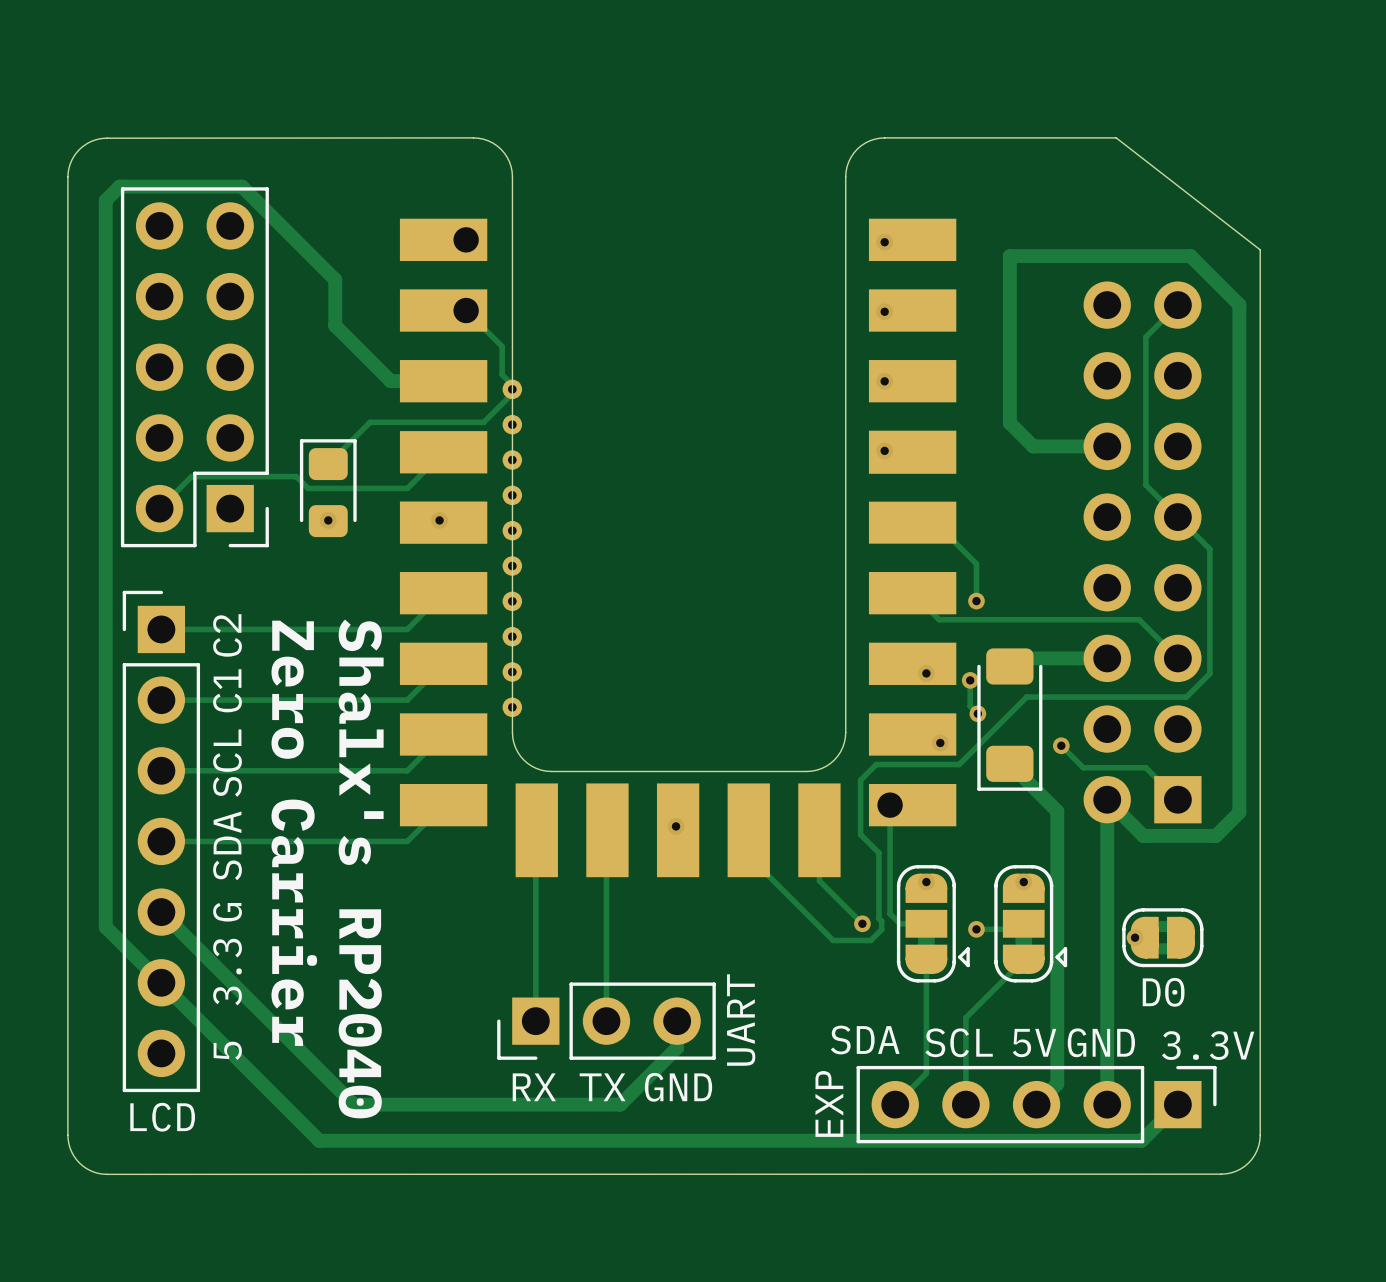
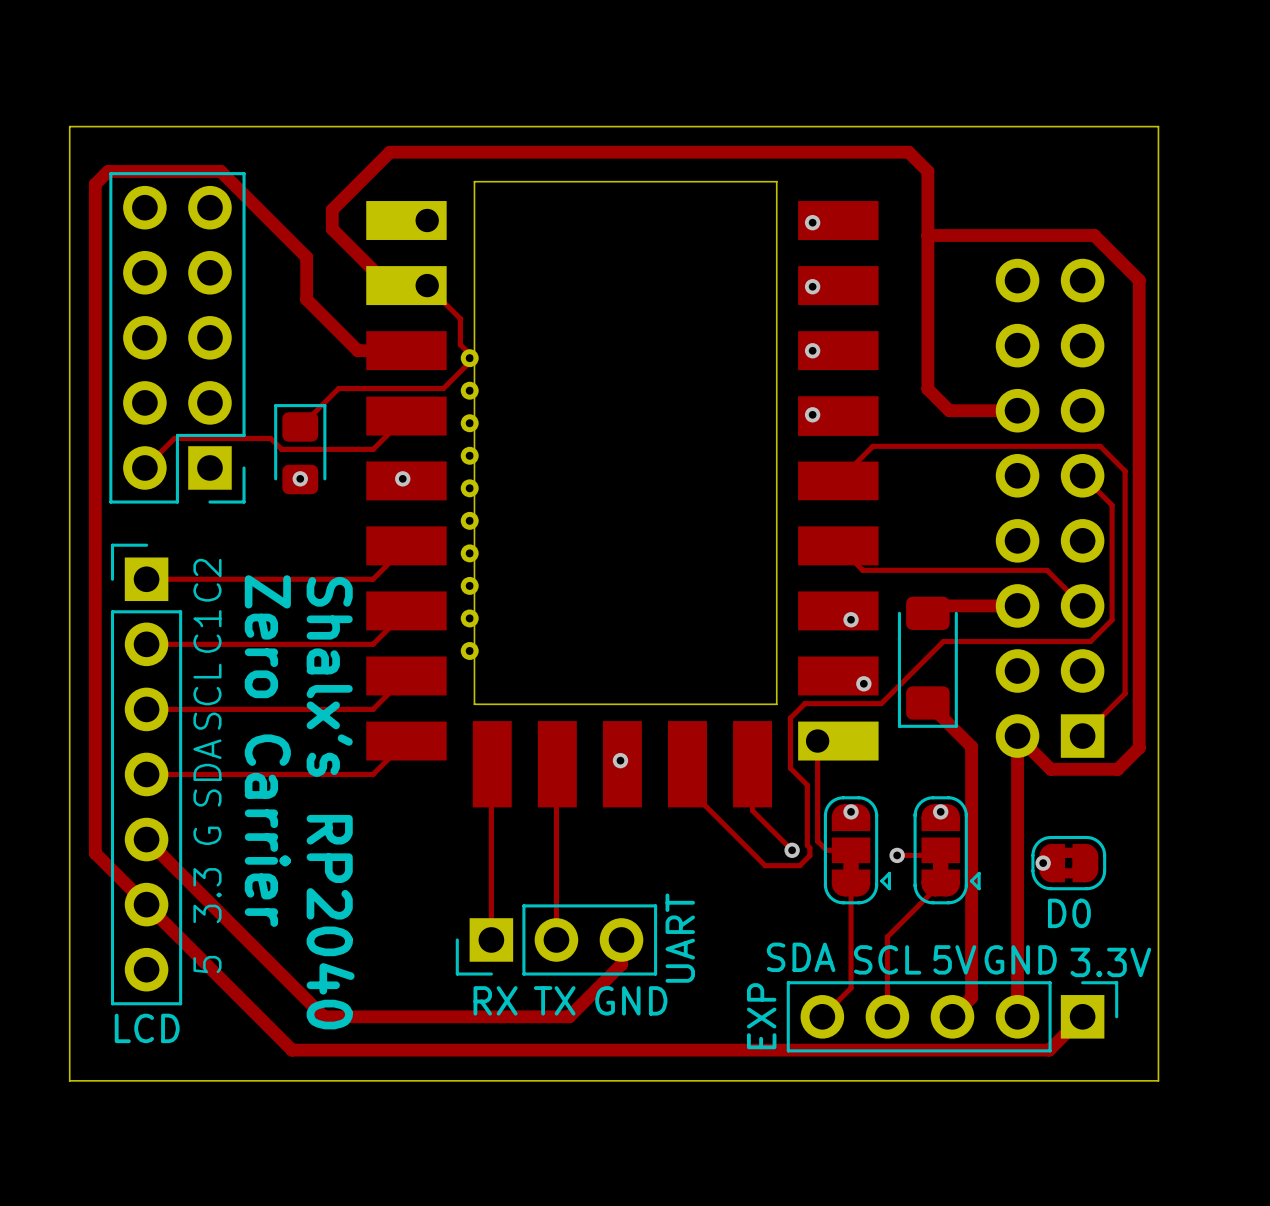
board edge: (884, 137) (865, 143) (850, 157) (846, 171) (845, 197) -> (776, 674) (776, 704) (474, 704) (474, 181) (776, 181)
board edge: (1116, 137) (1260, 249) -> (1025, 126) (1158, 126) (1158, 229)
track: none -> (927, 235) (927, 171) (908, 152) (389, 152) (332, 209) (332, 229) (393, 290)
track: (1177, 305) (1145, 337) (1145, 485) (1177, 517) -> none
track: (912, 522) (935, 522) (976, 563) (976, 601) -> none
via: (976, 601) -> none
track: (970, 680) (970, 706) (977, 713) -> none
via: (970, 680) -> none
via: (977, 713) -> none
board edge: (845, 732) (842, 747) (834, 760) (821, 768) (806, 771) (546, 771) (527, 763) (517, 752) (512, 732) (512, 176) (507, 157) (497, 145) (483, 139) (473, 137) (107, 138) (90, 141) (76, 152) (70, 163) (67, 176) (67, 1135) (71, 1152) (82, 1165) (94, 1172) (107, 1174) (1221, 1174) (1236, 1171) (1248, 1162) (1257, 1150) (1260, 1135) -> (812, 126) (69, 126) (69, 1080) (1158, 1080) (1158, 1044)
track: (1061, 745) (1083, 767) (1145, 767) (1177, 799) -> (838, 480) (872, 446) (1100, 446) (1125, 471) (1125, 693) (1082, 736)
via: (1061, 745) -> none

